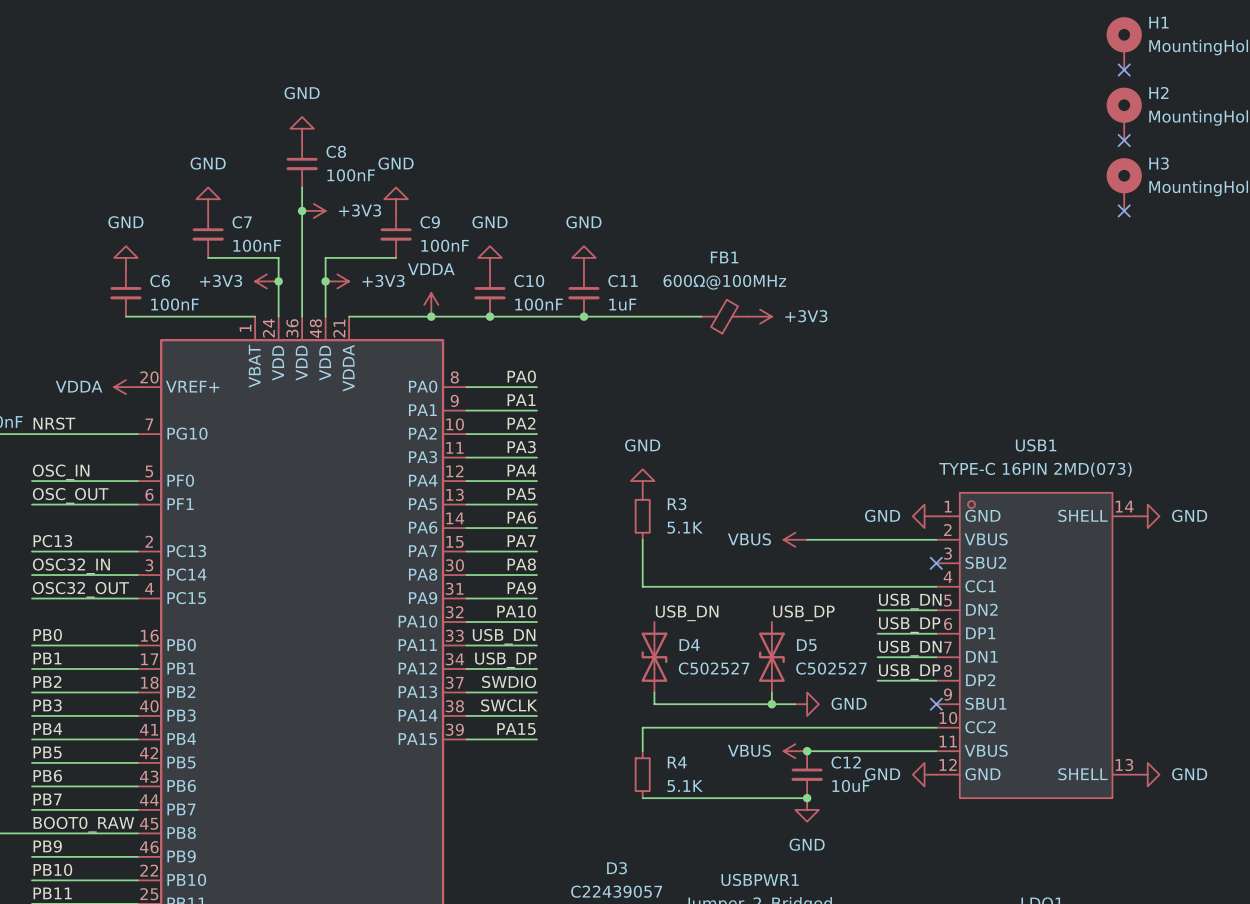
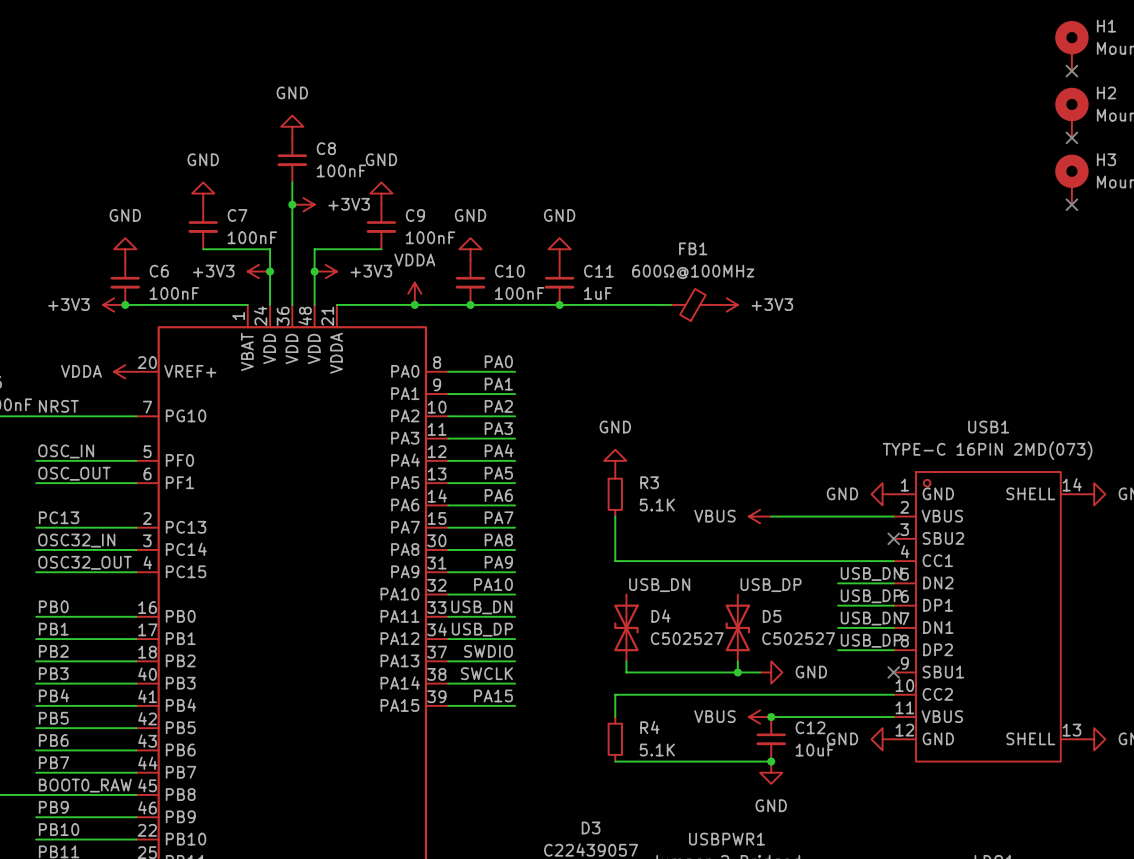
power symbol: none -> +3V3 (114, 304)
junction: none -> (125, 304)

